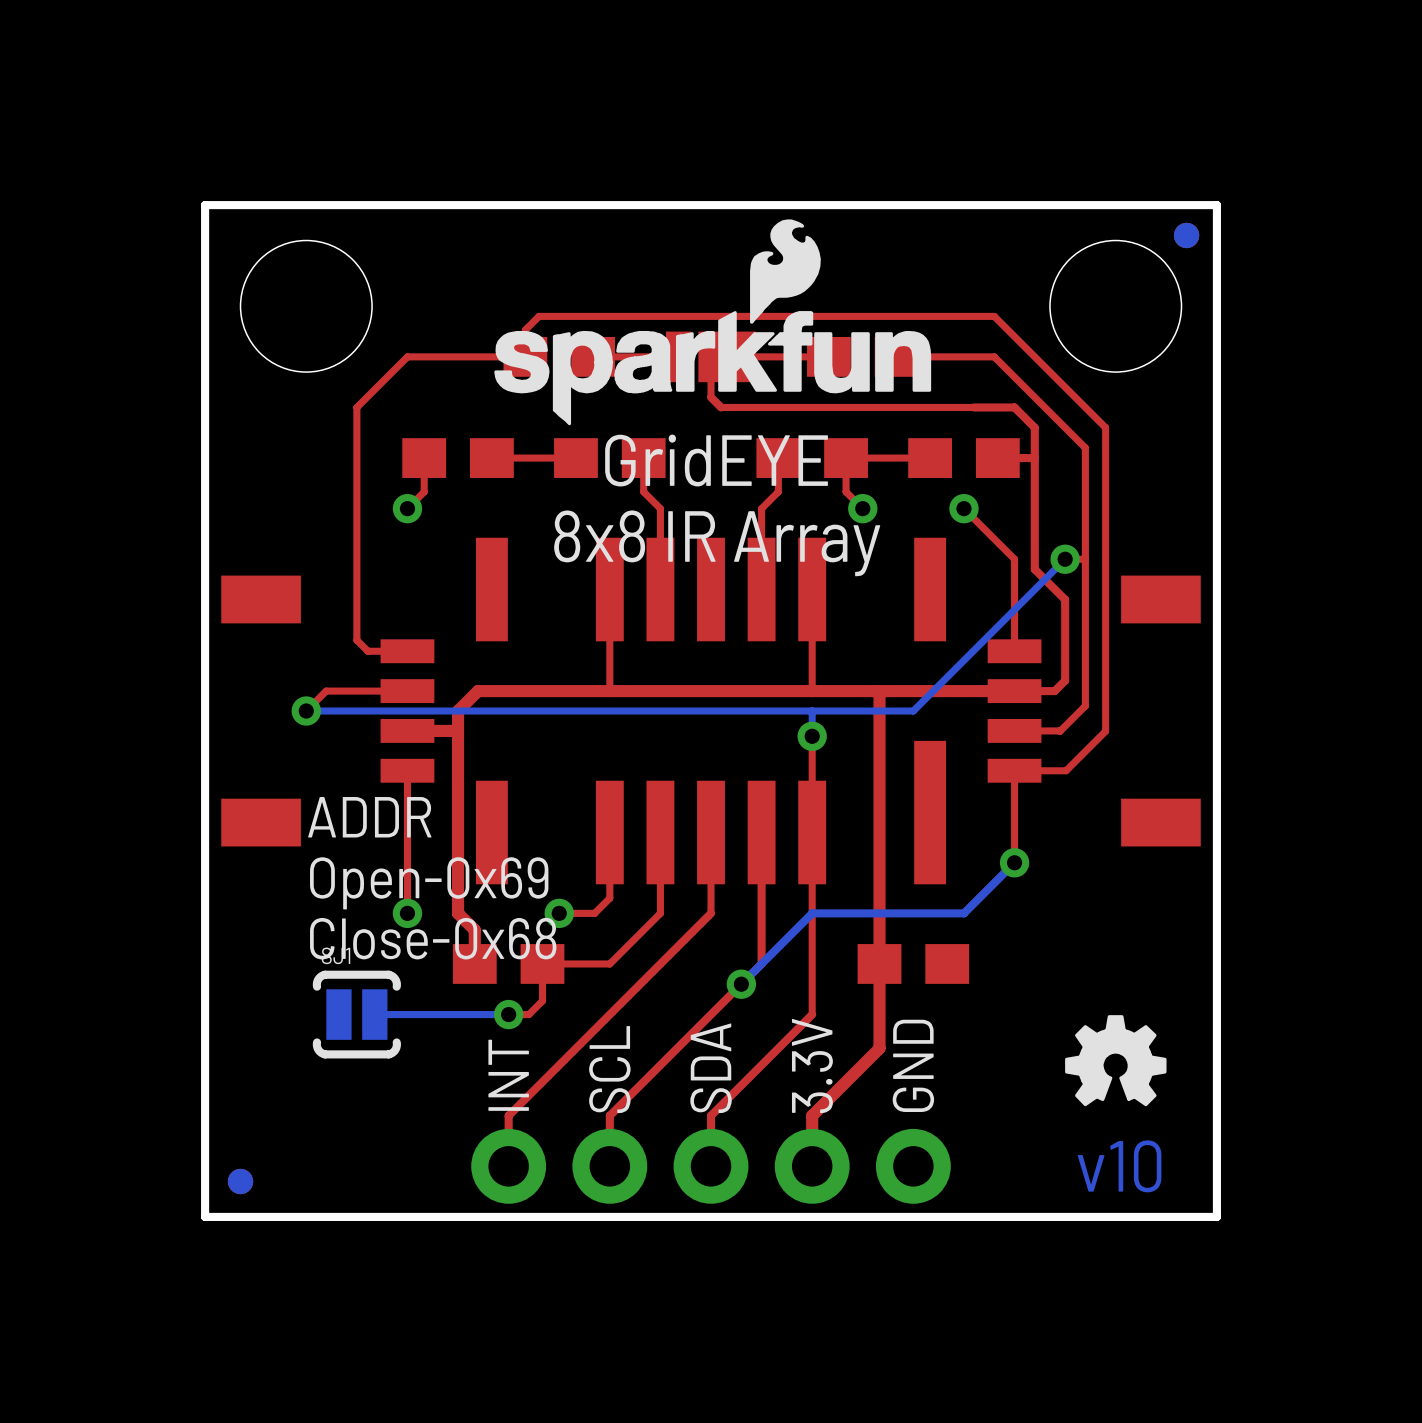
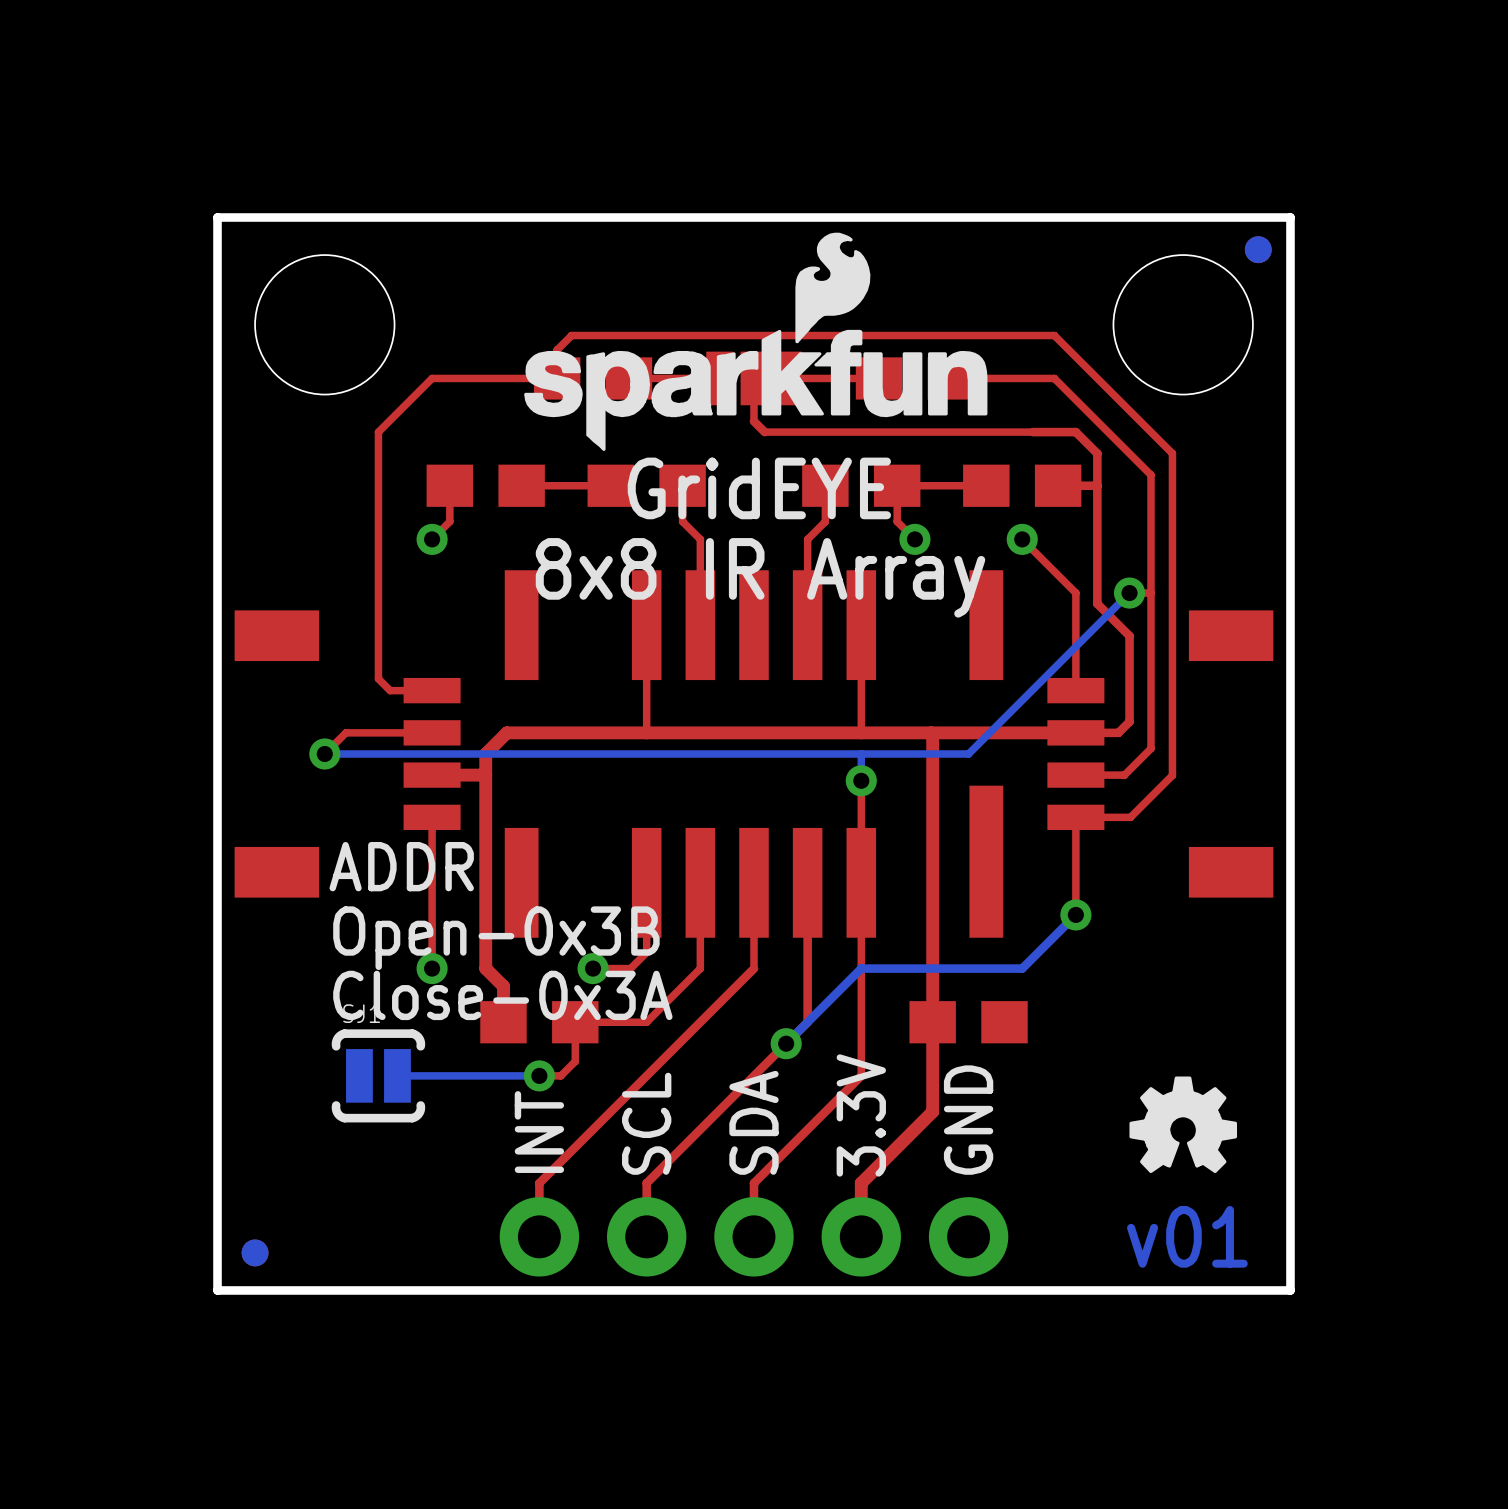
text: Open-0x69 (429, 883) -> Open-0x3B (496, 938)
text: Close-0x68 (433, 938) -> Close-0x3A (502, 995)
text: v10 (1119, 1166) -> v01 (1187, 1236)

